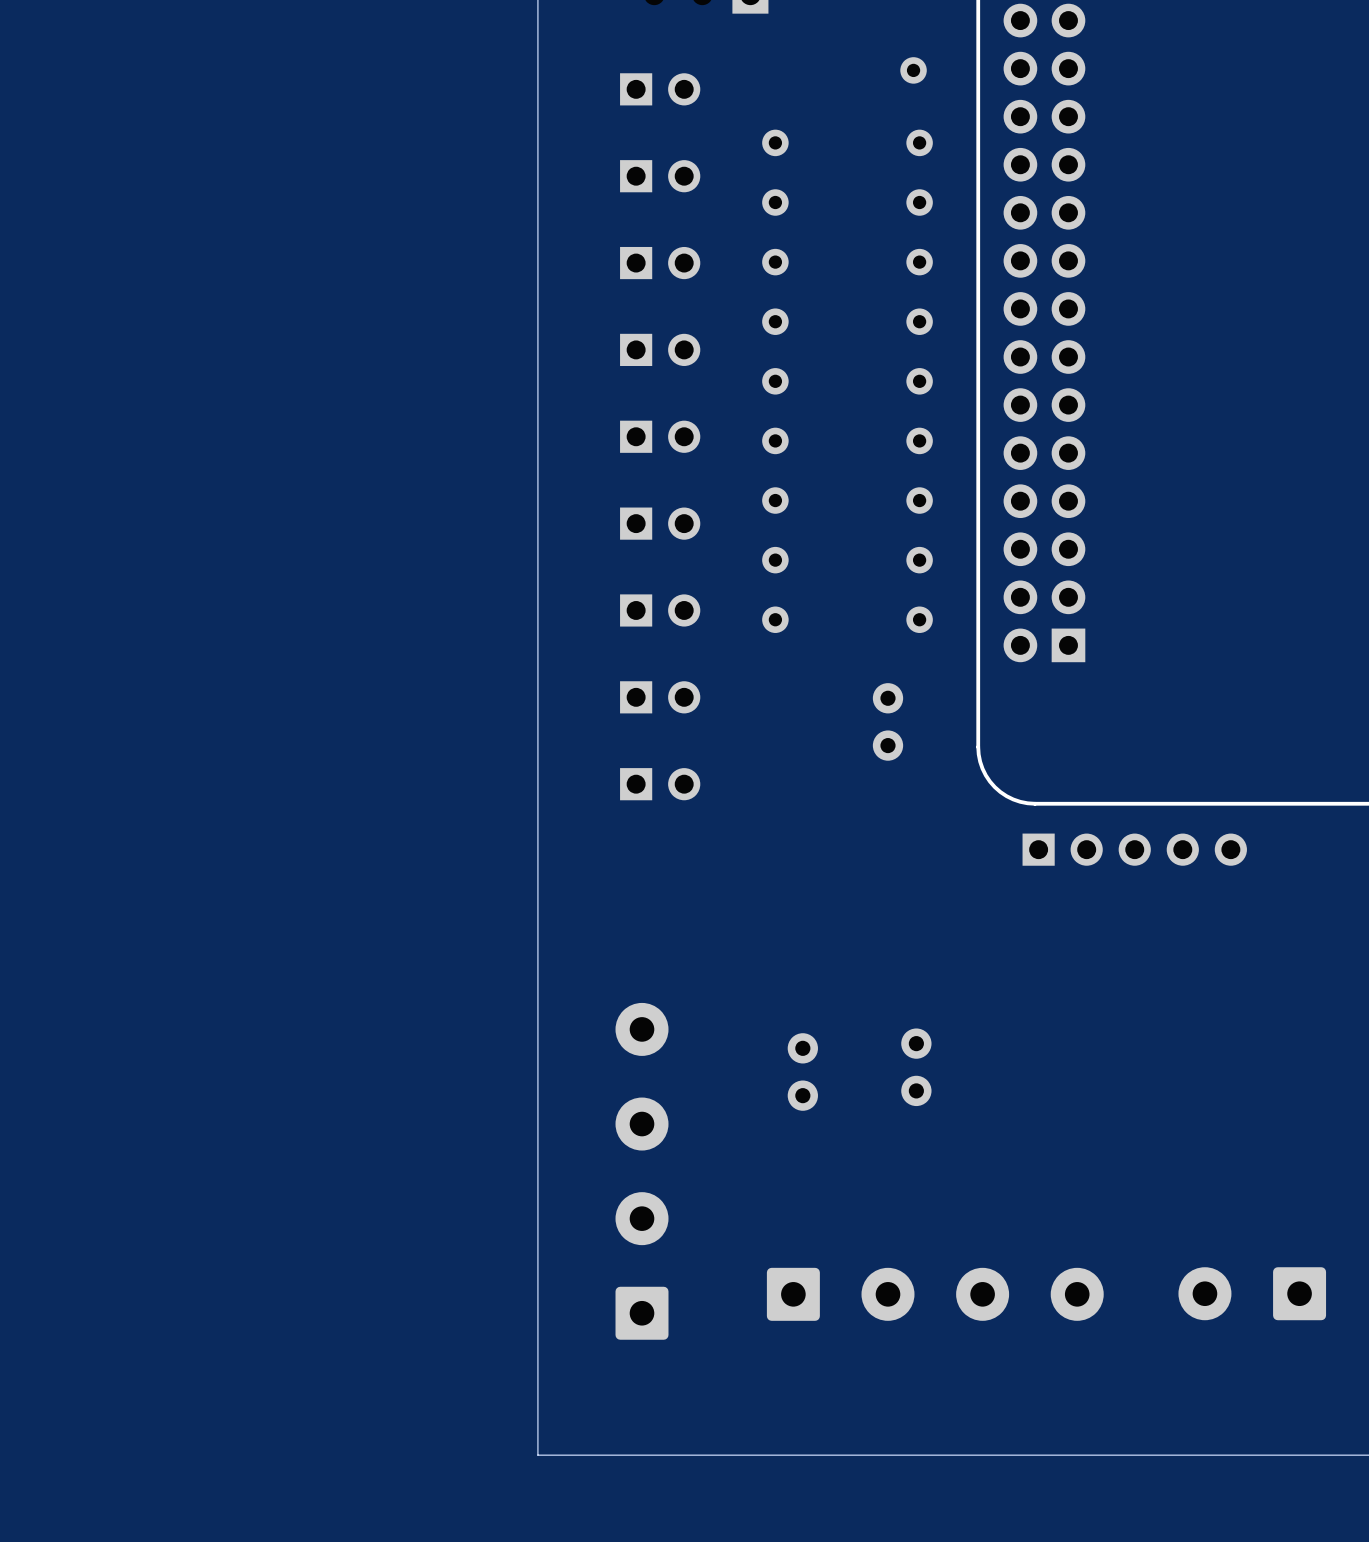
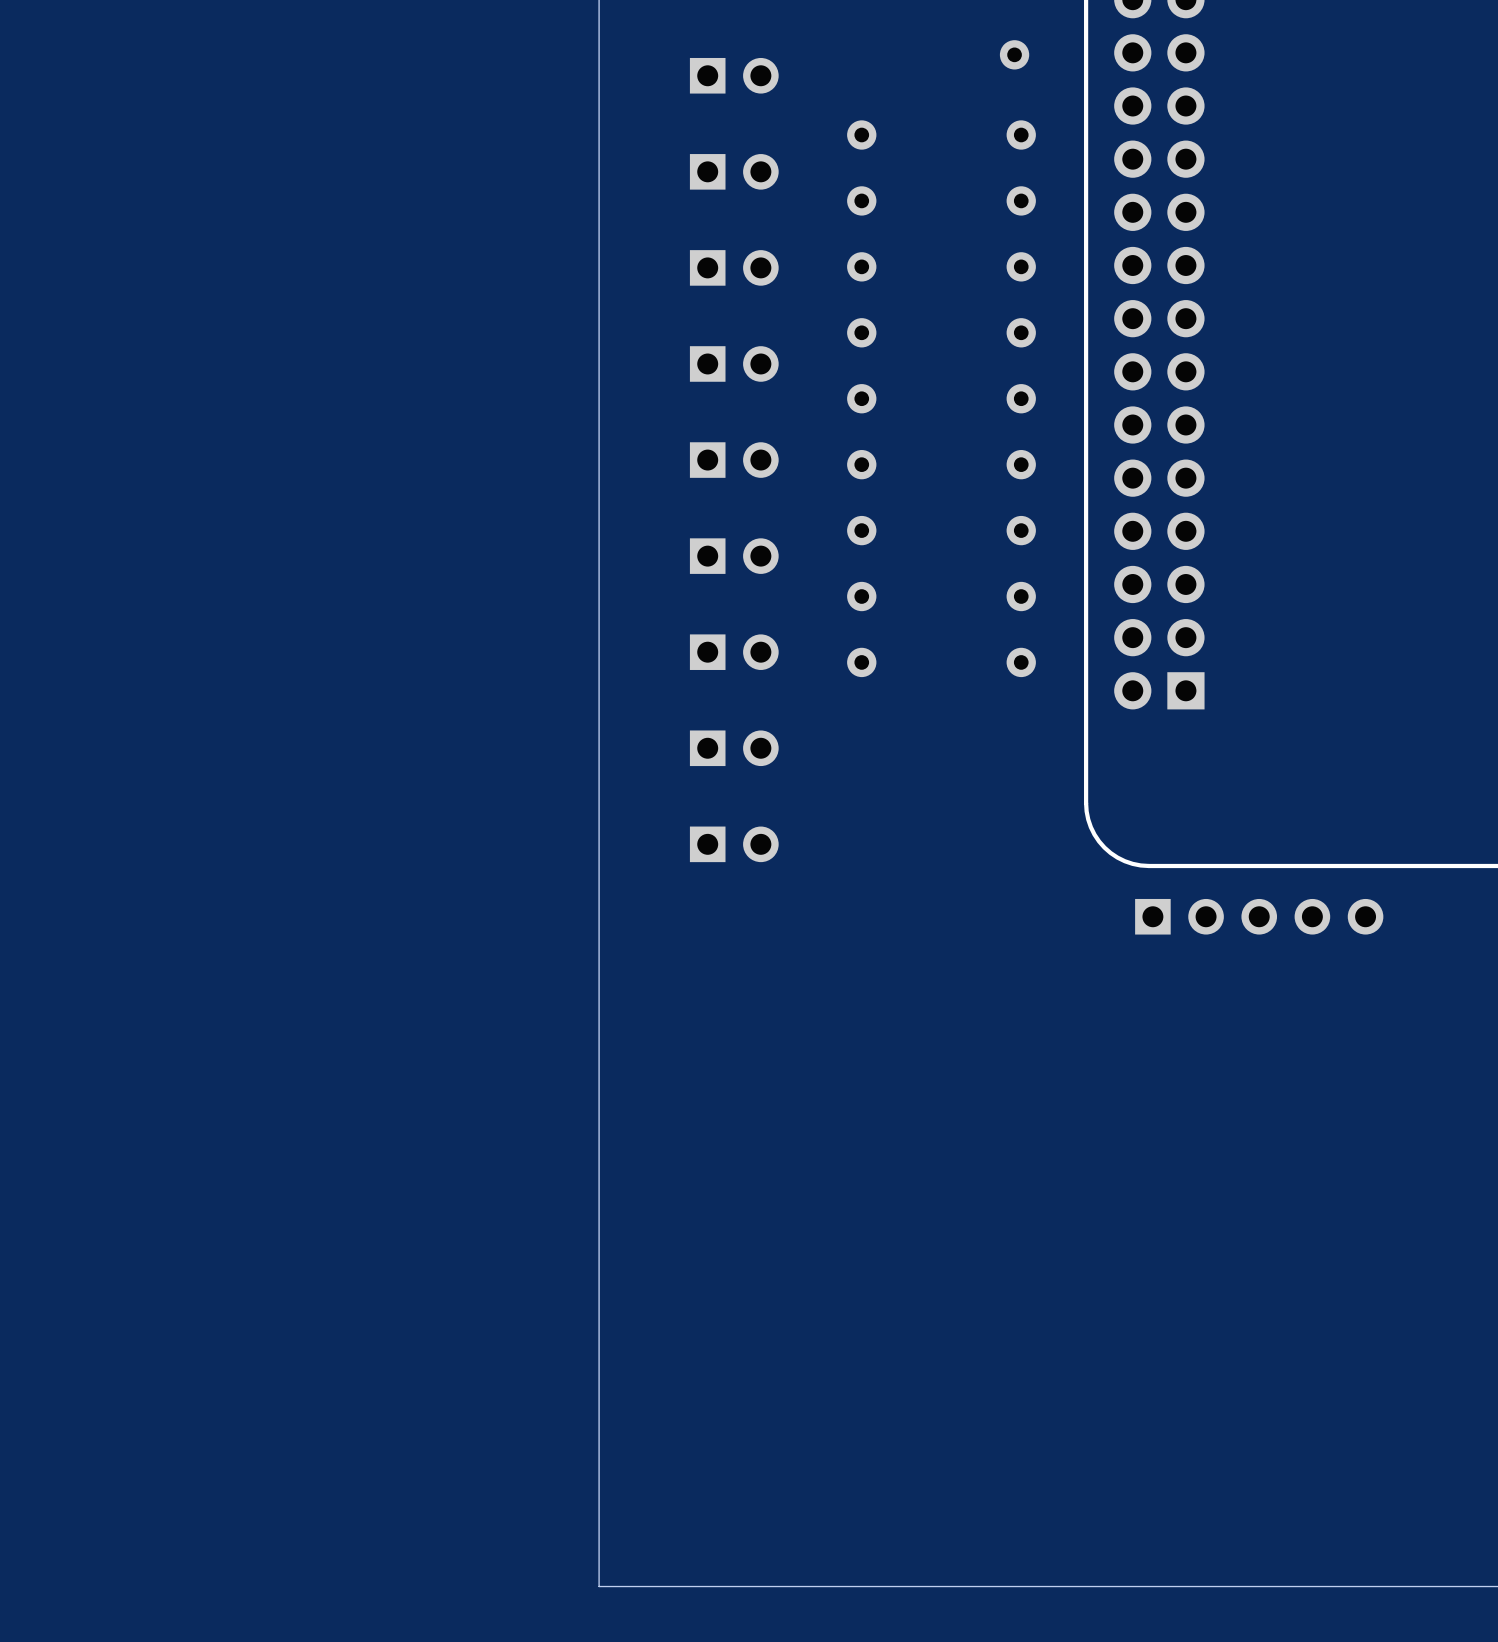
part: (887, 721) -> none
part: (916, 1067) -> none
part: (802, 1071) -> none
part: (642, 1171) -> none
part: (1252, 1293) -> none
part: (935, 1294) -> none

